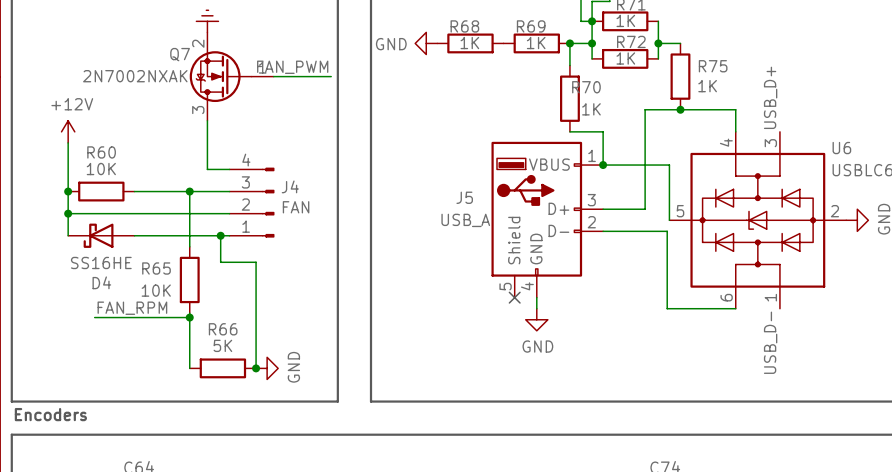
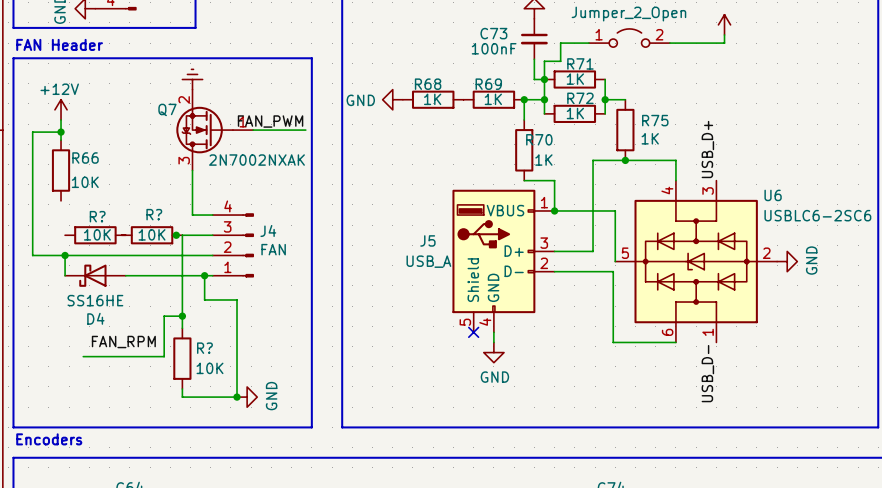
wire: none -> (61, 119) (61, 140)
Q7 value position: 2N7002NXAK (135, 76) -> 2N7002NXAK (256, 160)
junction: none -> (61, 132)
power symbol text position: +12V (72, 104) -> +12V (59, 89)
power symbol position: +12V (68, 131) -> +12V (61, 109)
wire: (68, 142) (68, 213) -> (61, 132) (32, 132) (32, 255) (65, 255)
R60 name: R60 (101, 152) -> R? (97, 216)
R60 value position: 10K (101, 169) -> 10K (97, 234)
junction: (68, 191) -> none
wire: (134, 191) (196, 191) -> (182, 328) (182, 235)
R?: none -> 10K (152, 235)
wire: (189, 191) (189, 246) -> none
R65: 10K (189, 279) -> none
wire: none -> (182, 316) (164, 316) (164, 356) (83, 356)
wire: (189, 313) (189, 368) -> none
wire: (94, 317) (189, 317) -> none
junction position: (189, 317) -> (182, 316)
R?: none -> 10K (182, 358)
R66 name position: R66 (223, 329) -> R66 (85, 158)
R66 value: 5K (222, 345) -> 10K (85, 182)
wire: none -> (182, 388) (182, 397) (237, 397)
R66 rotation: 0° (222, 368) -> 90° clockwise (61, 170)
R66 position: (222, 368) -> (61, 170)

